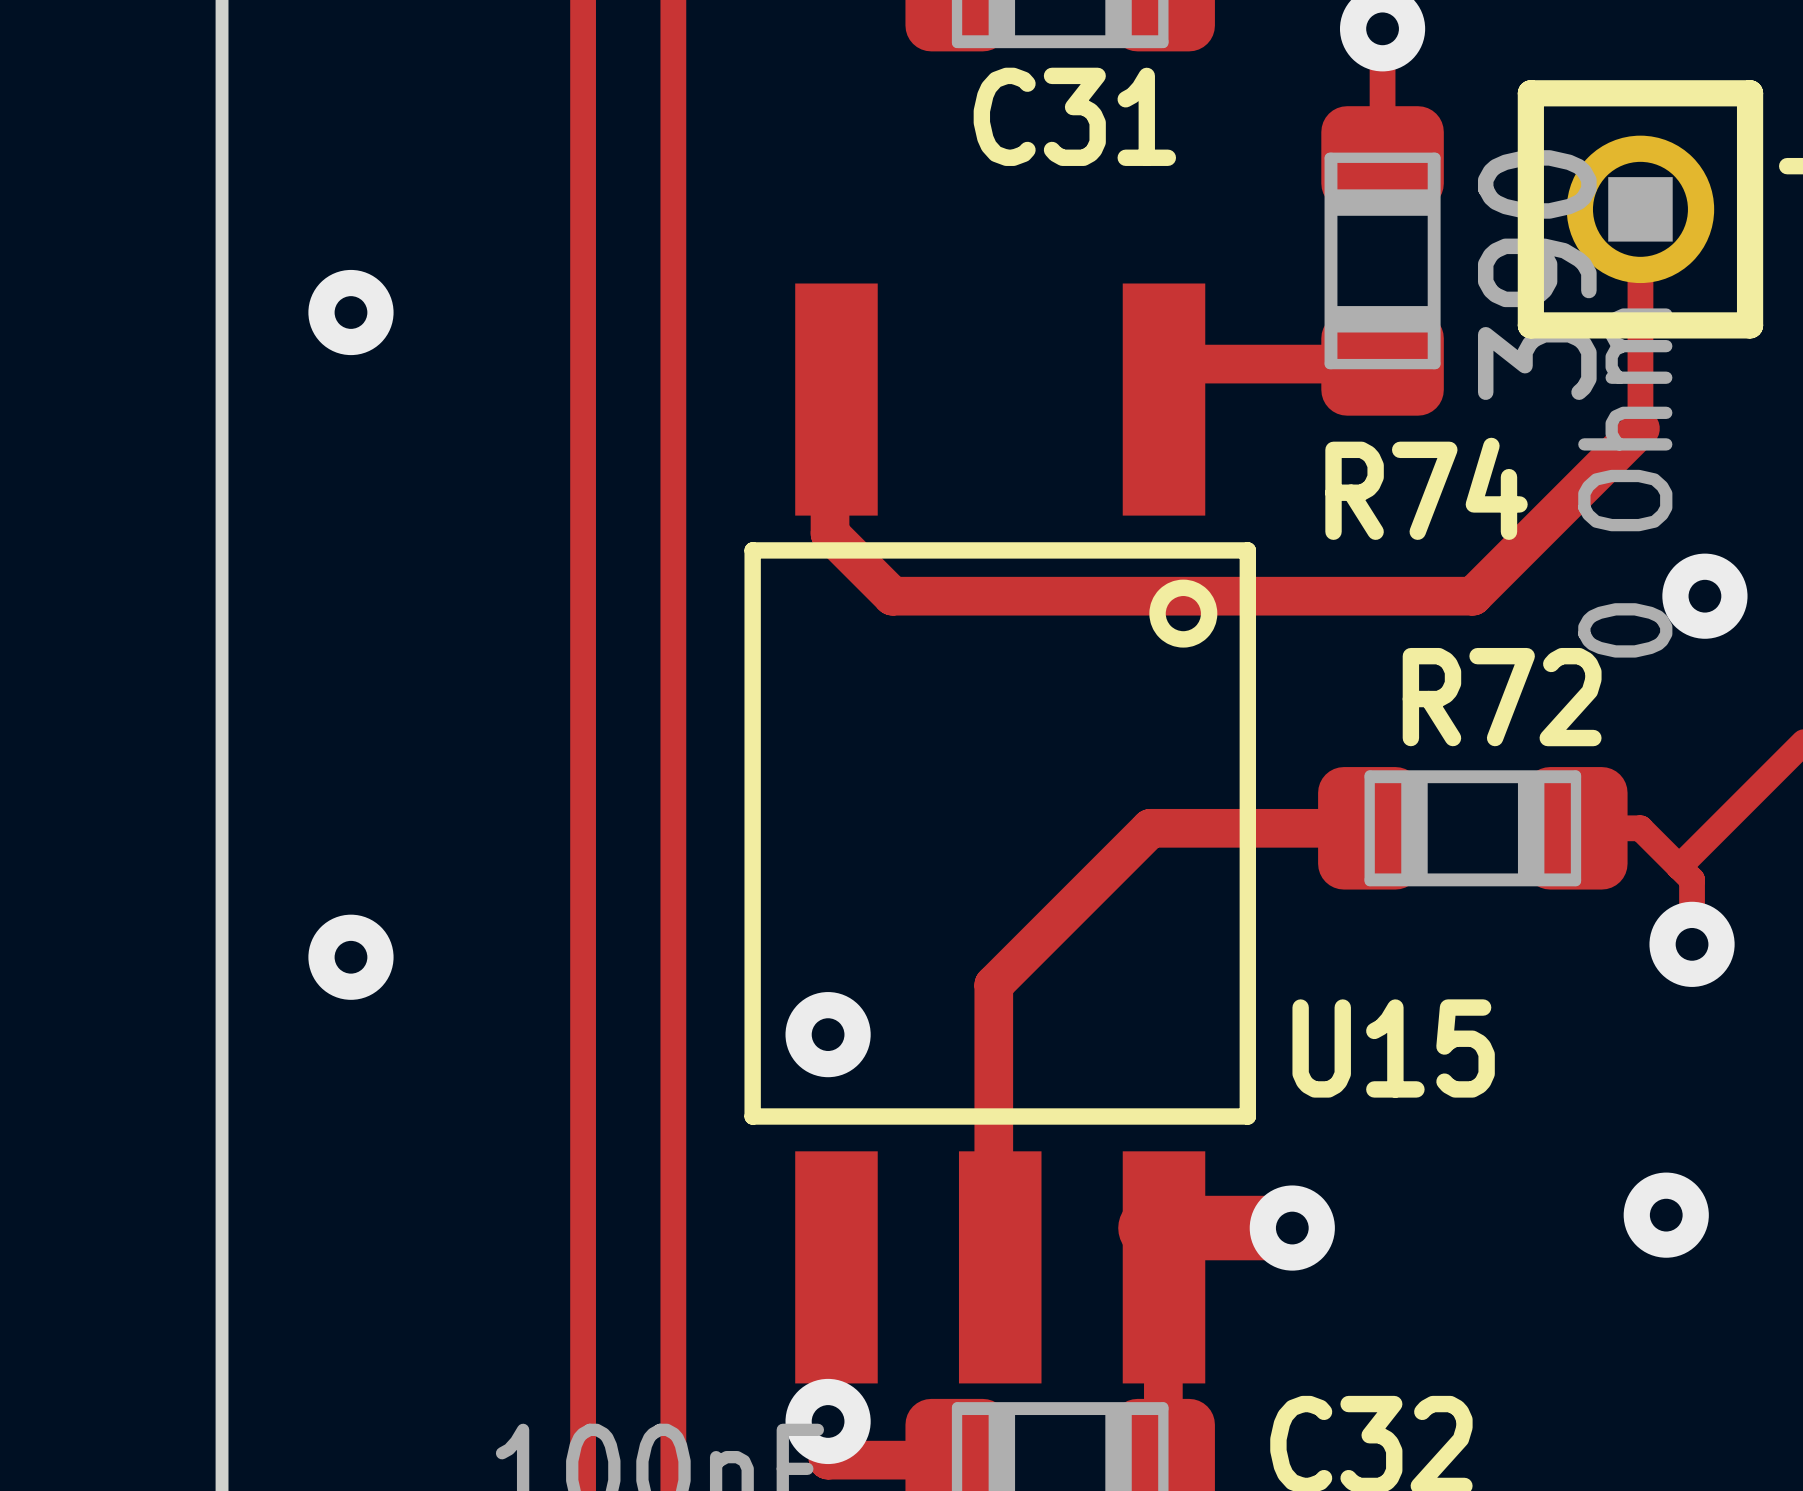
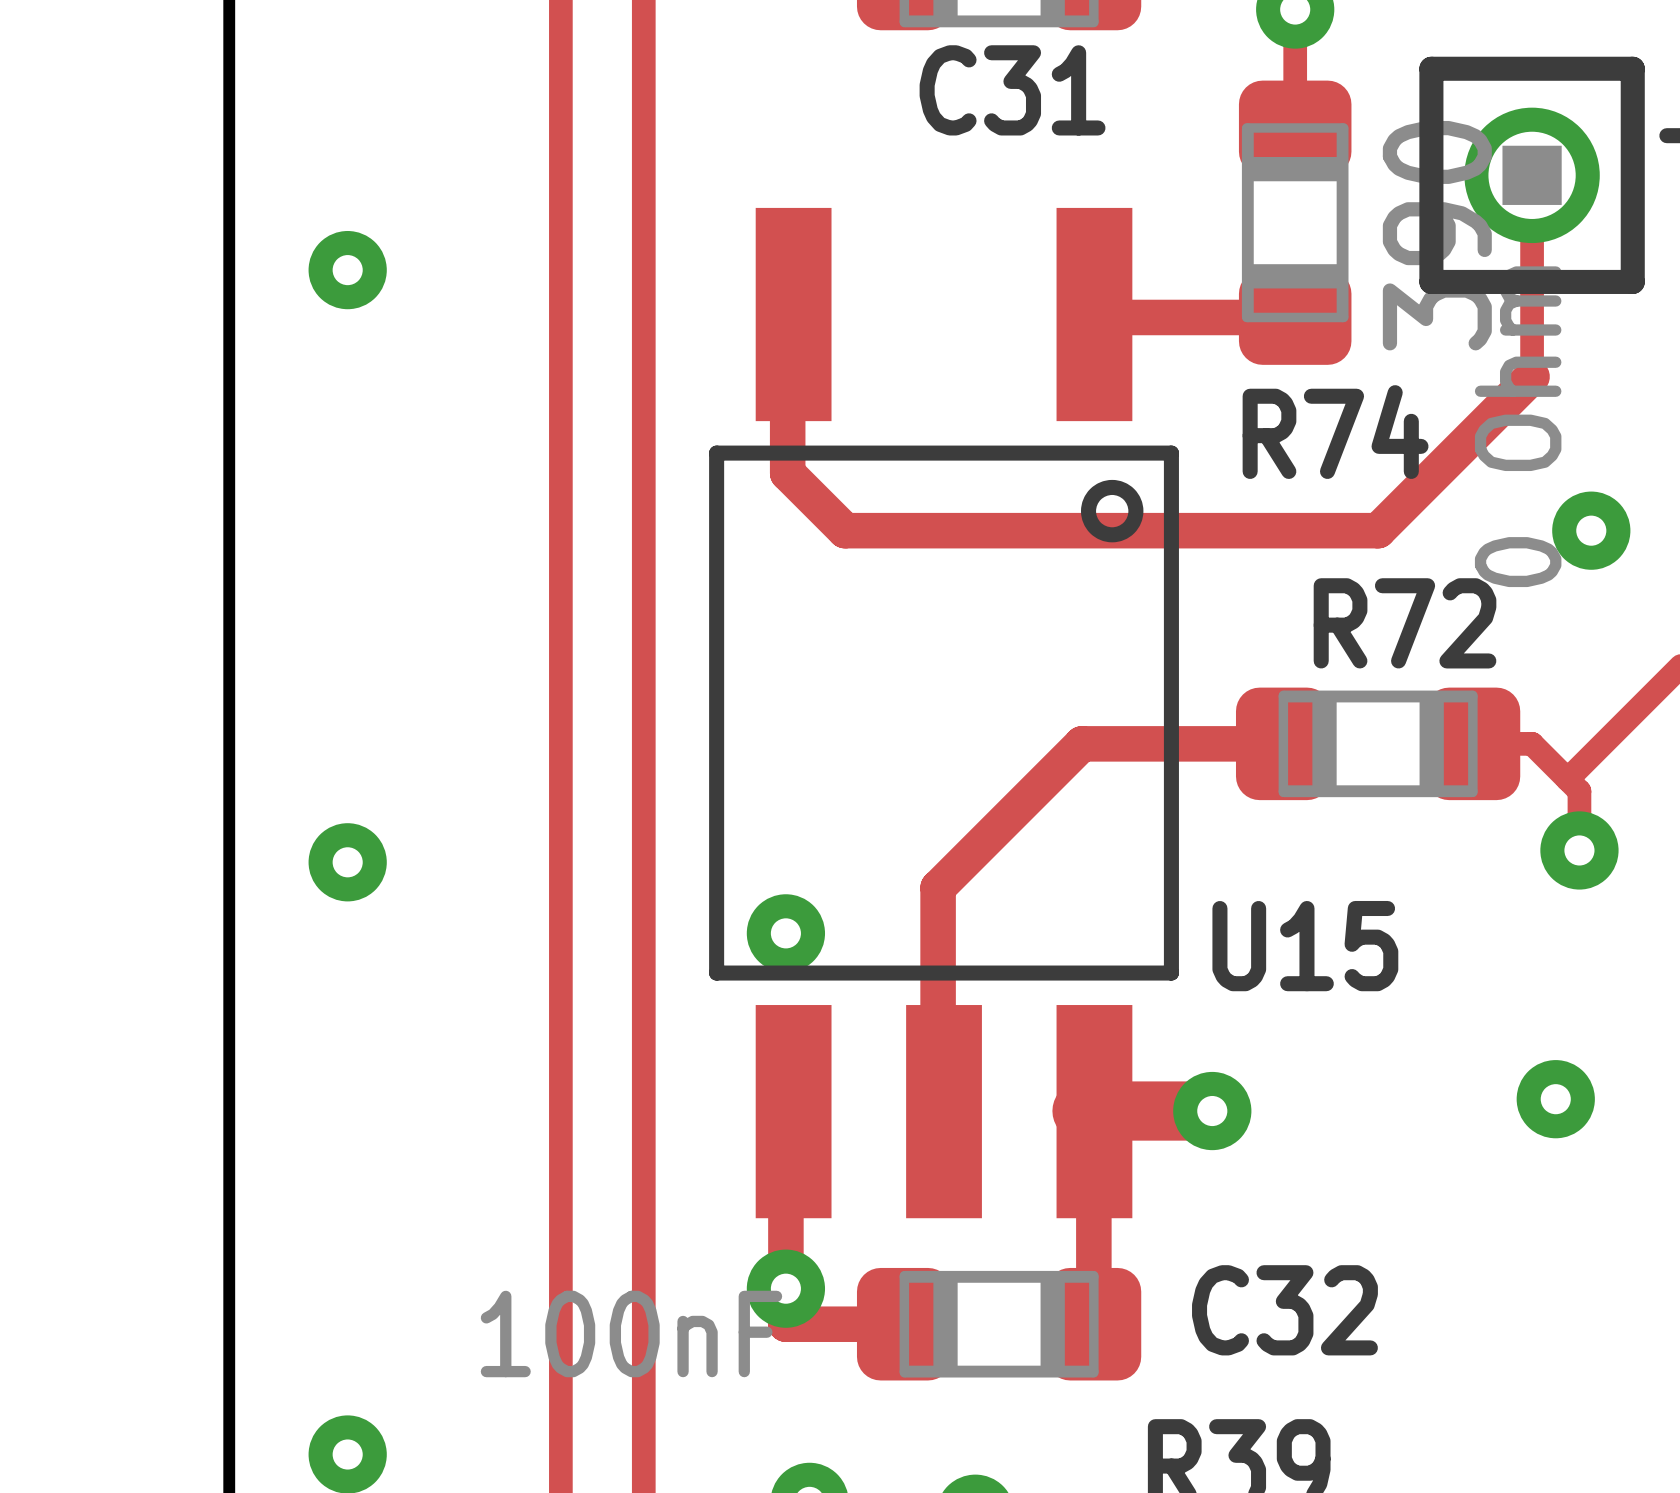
U15 position: (1000, 833) -> (944, 713)

